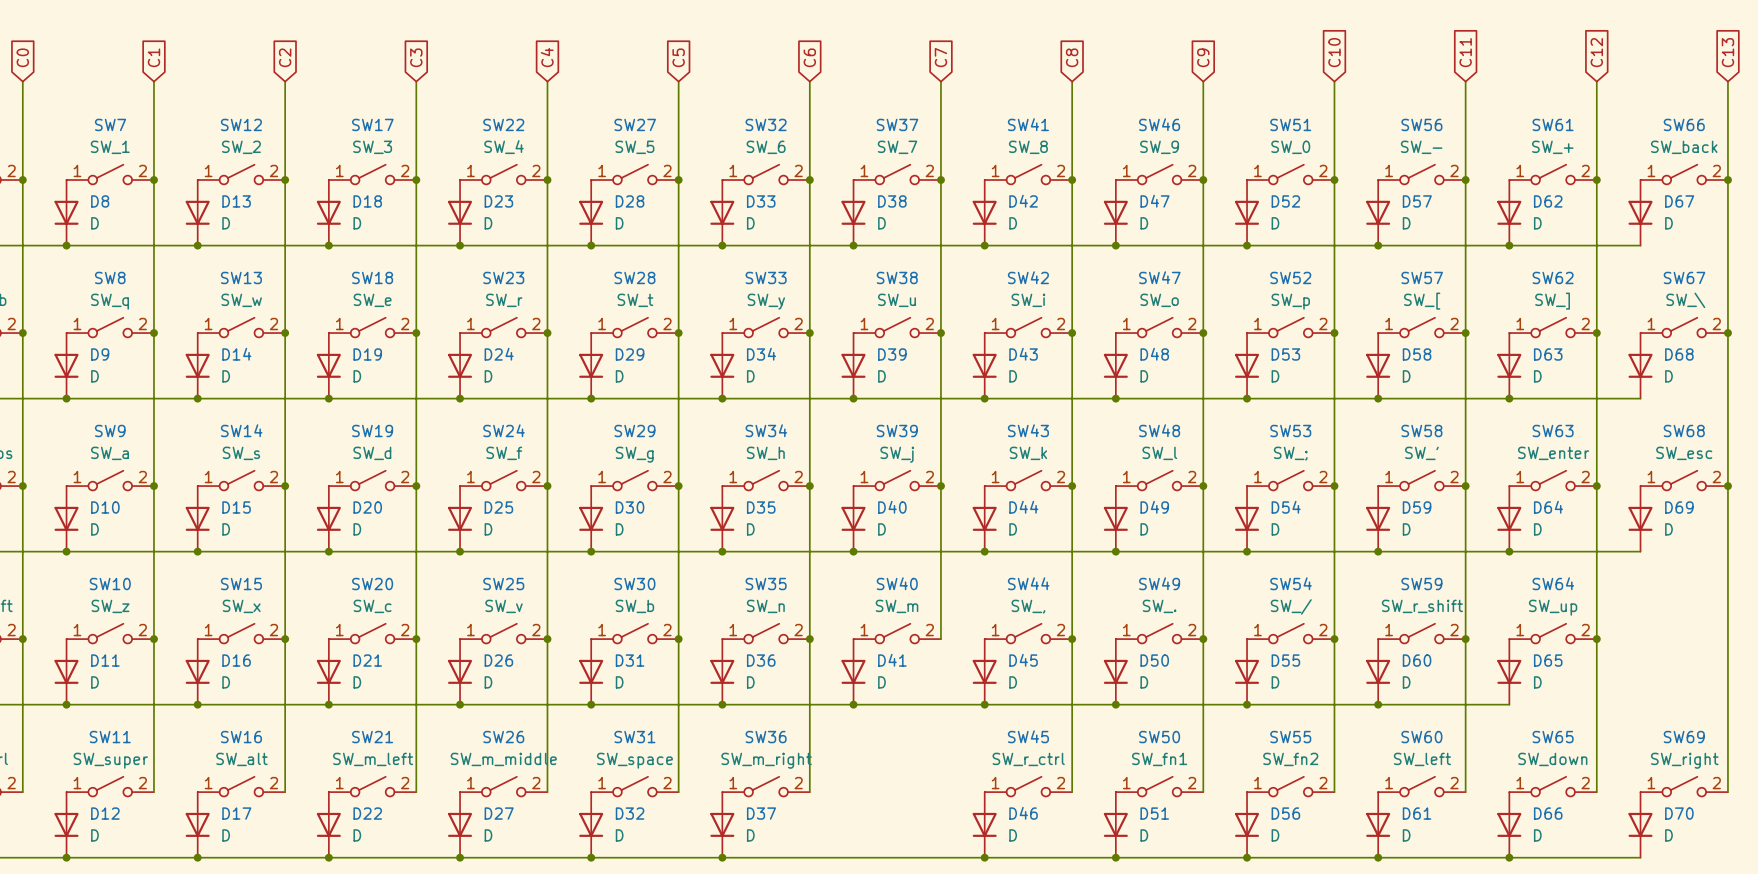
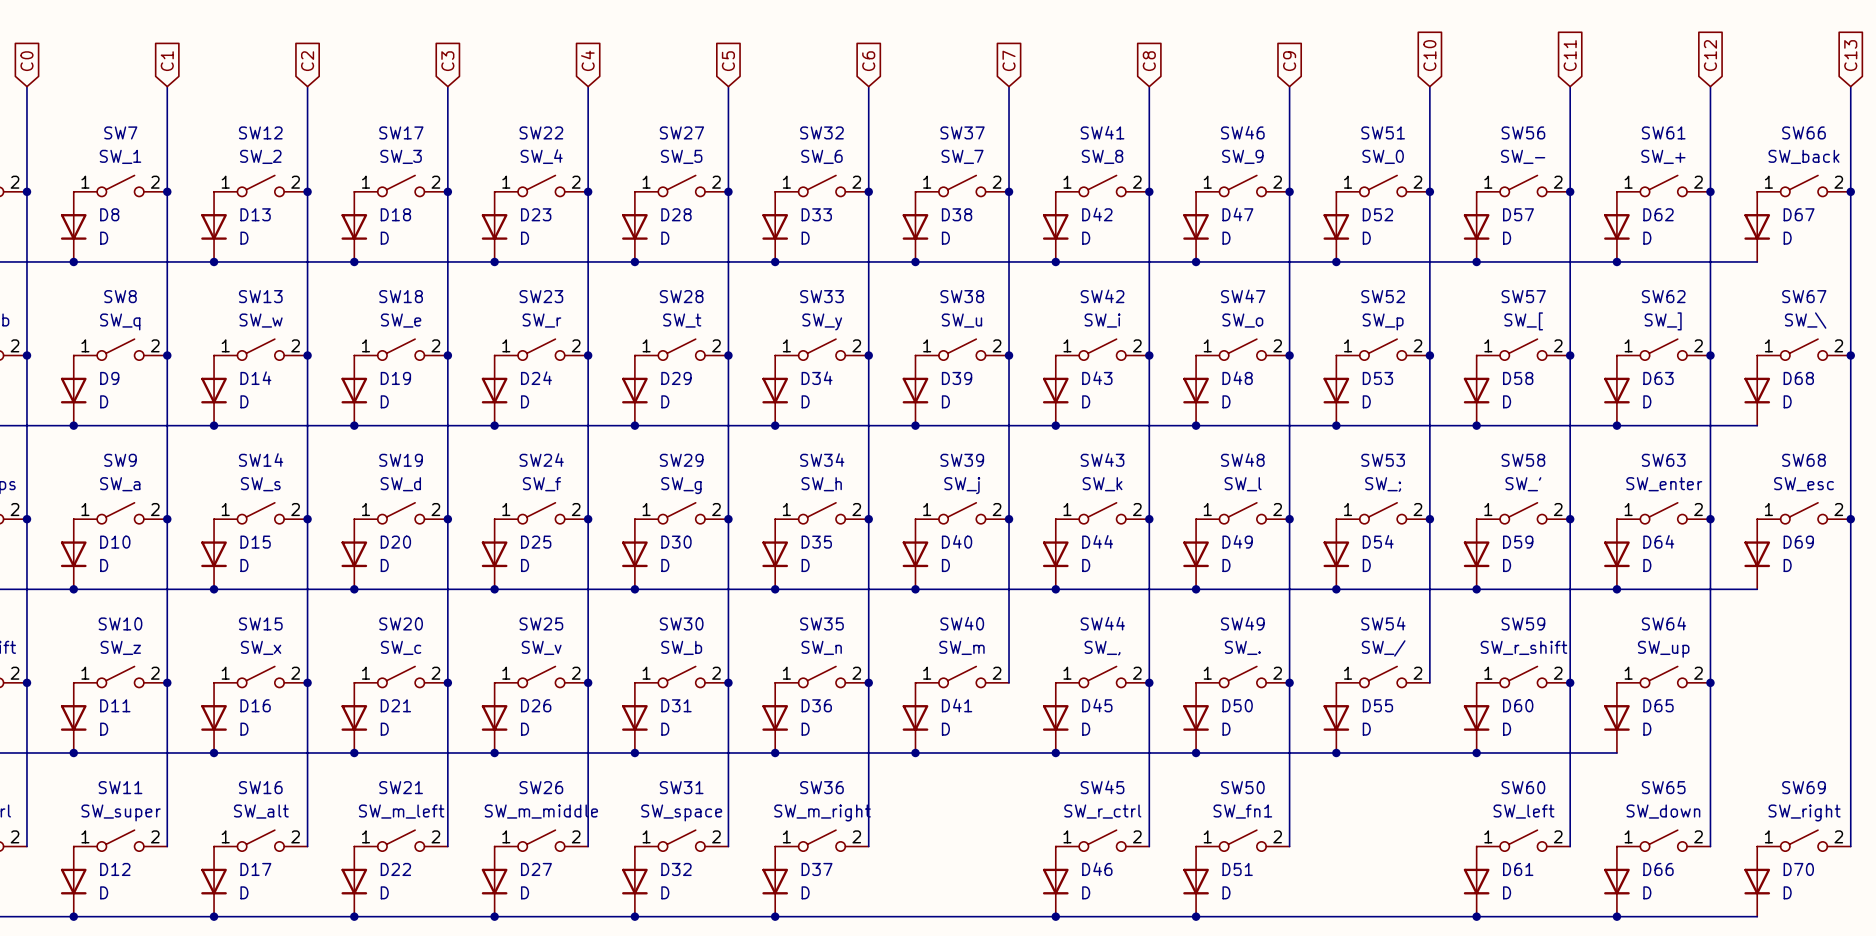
wire: (1334, 639) (1334, 792) -> none
junction: (1334, 639) -> none
SW55: SW_fn2 (1290, 786) -> none
D56: D (1247, 824) -> none
junction: (1247, 857) -> none

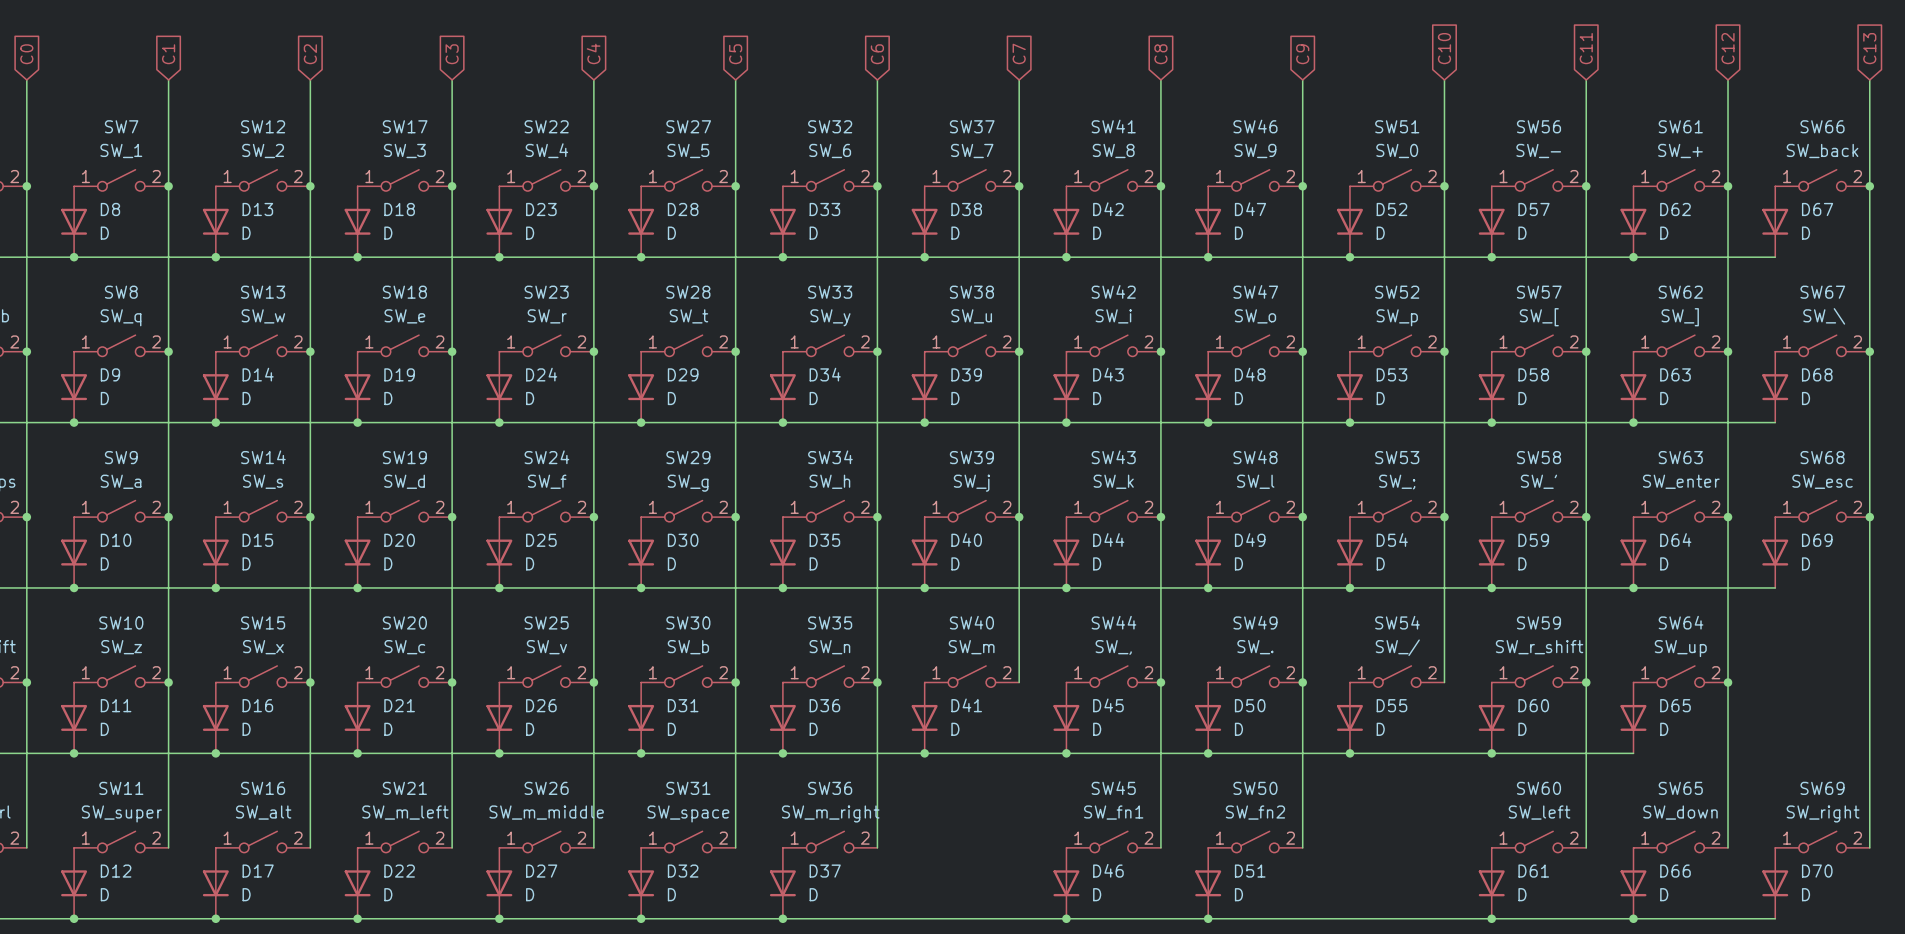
SW45 value: SW_r_ctrl (1102, 811) -> SW_fn1 (1113, 812)
SW50 value: SW_fn1 (1242, 811) -> SW_fn2 (1255, 812)

